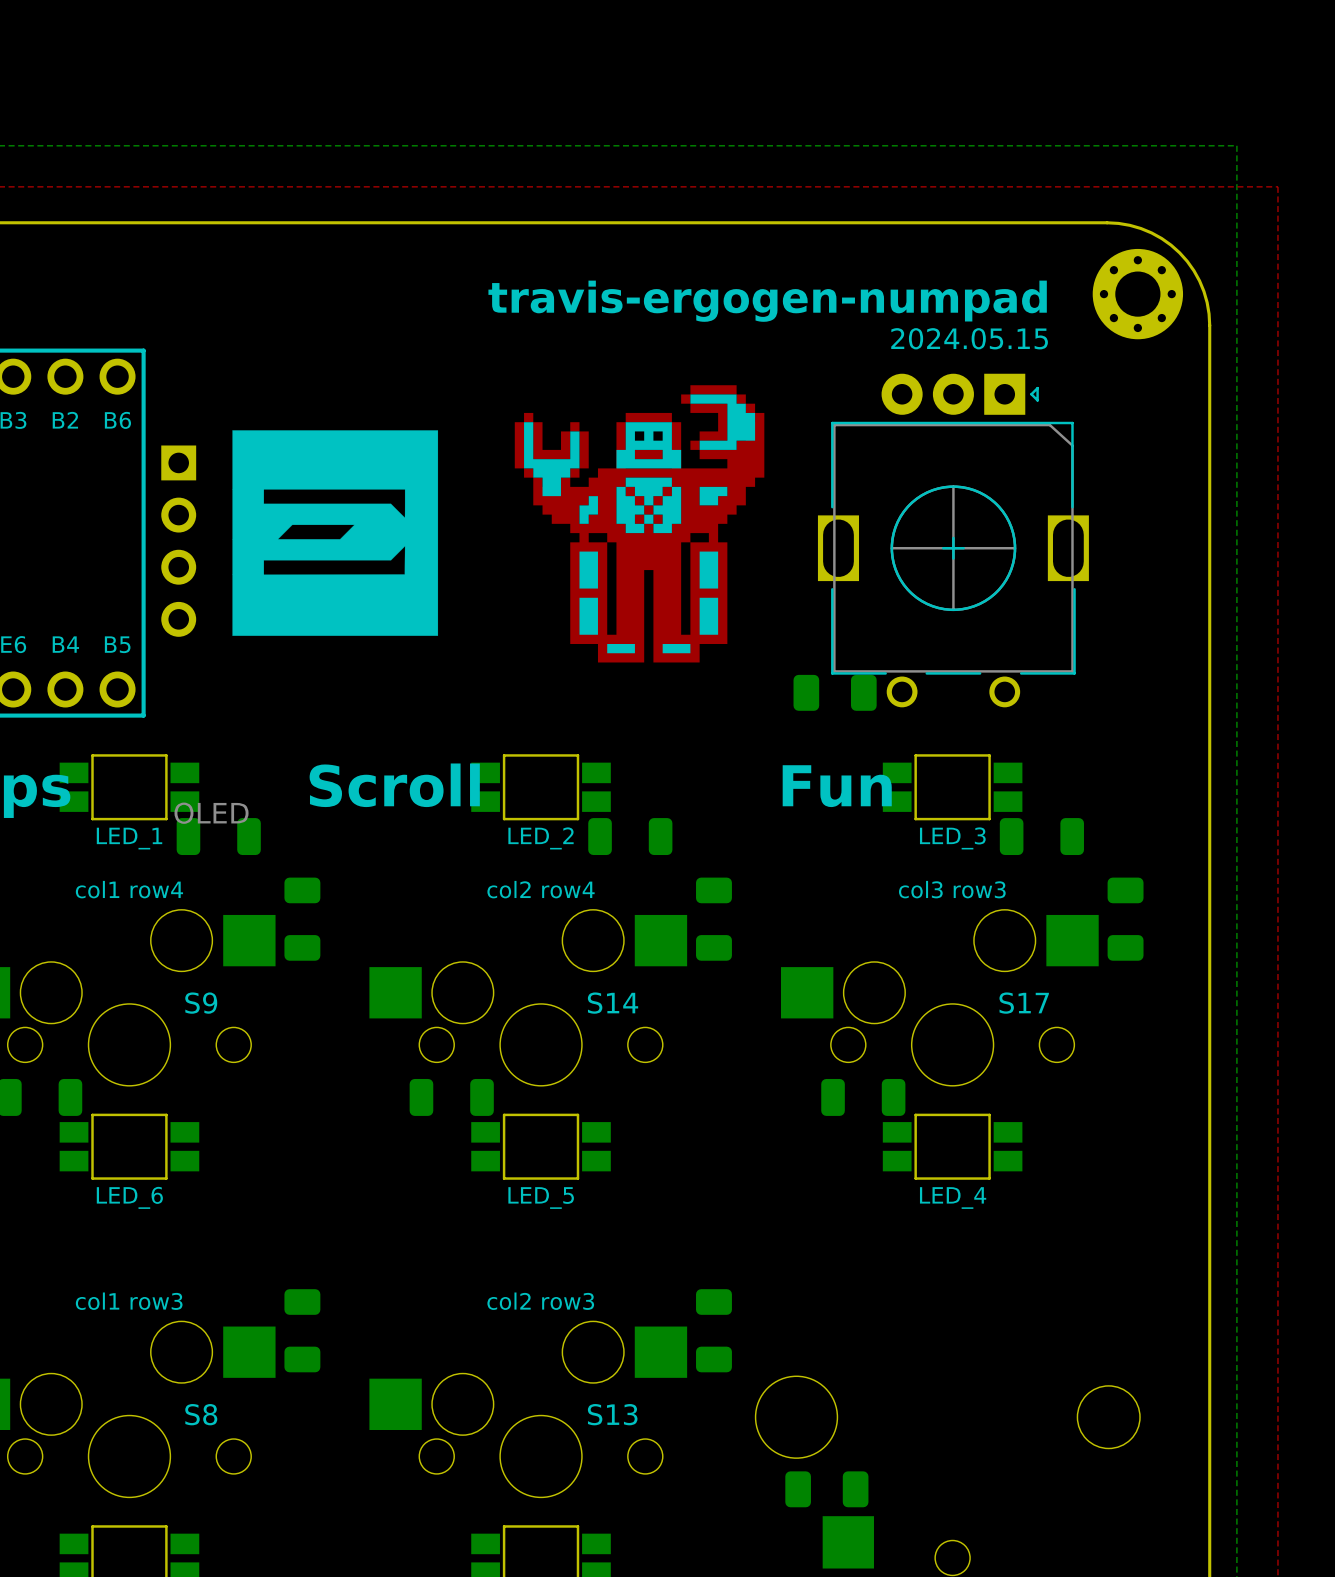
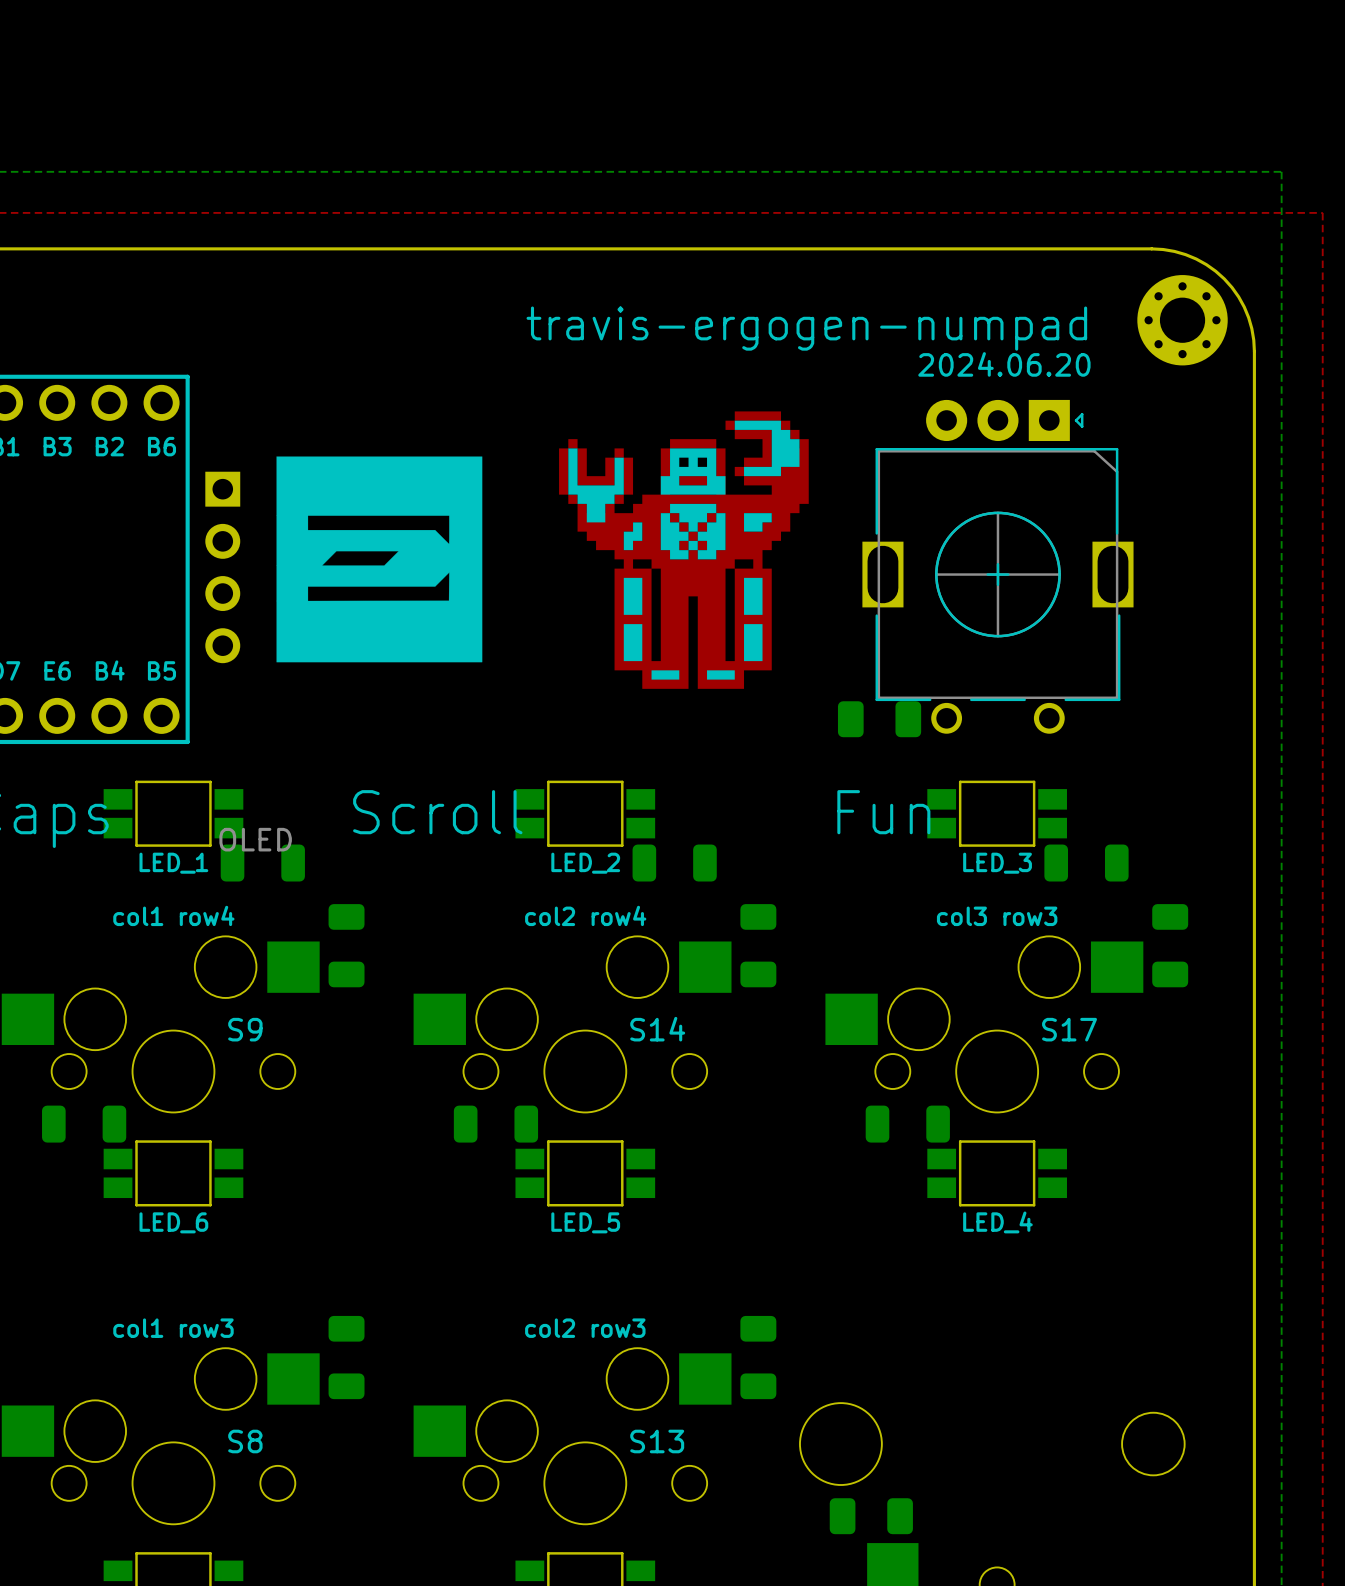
text: 2024.05.15 (969, 338) -> 2024.06.20 (1004, 364)

